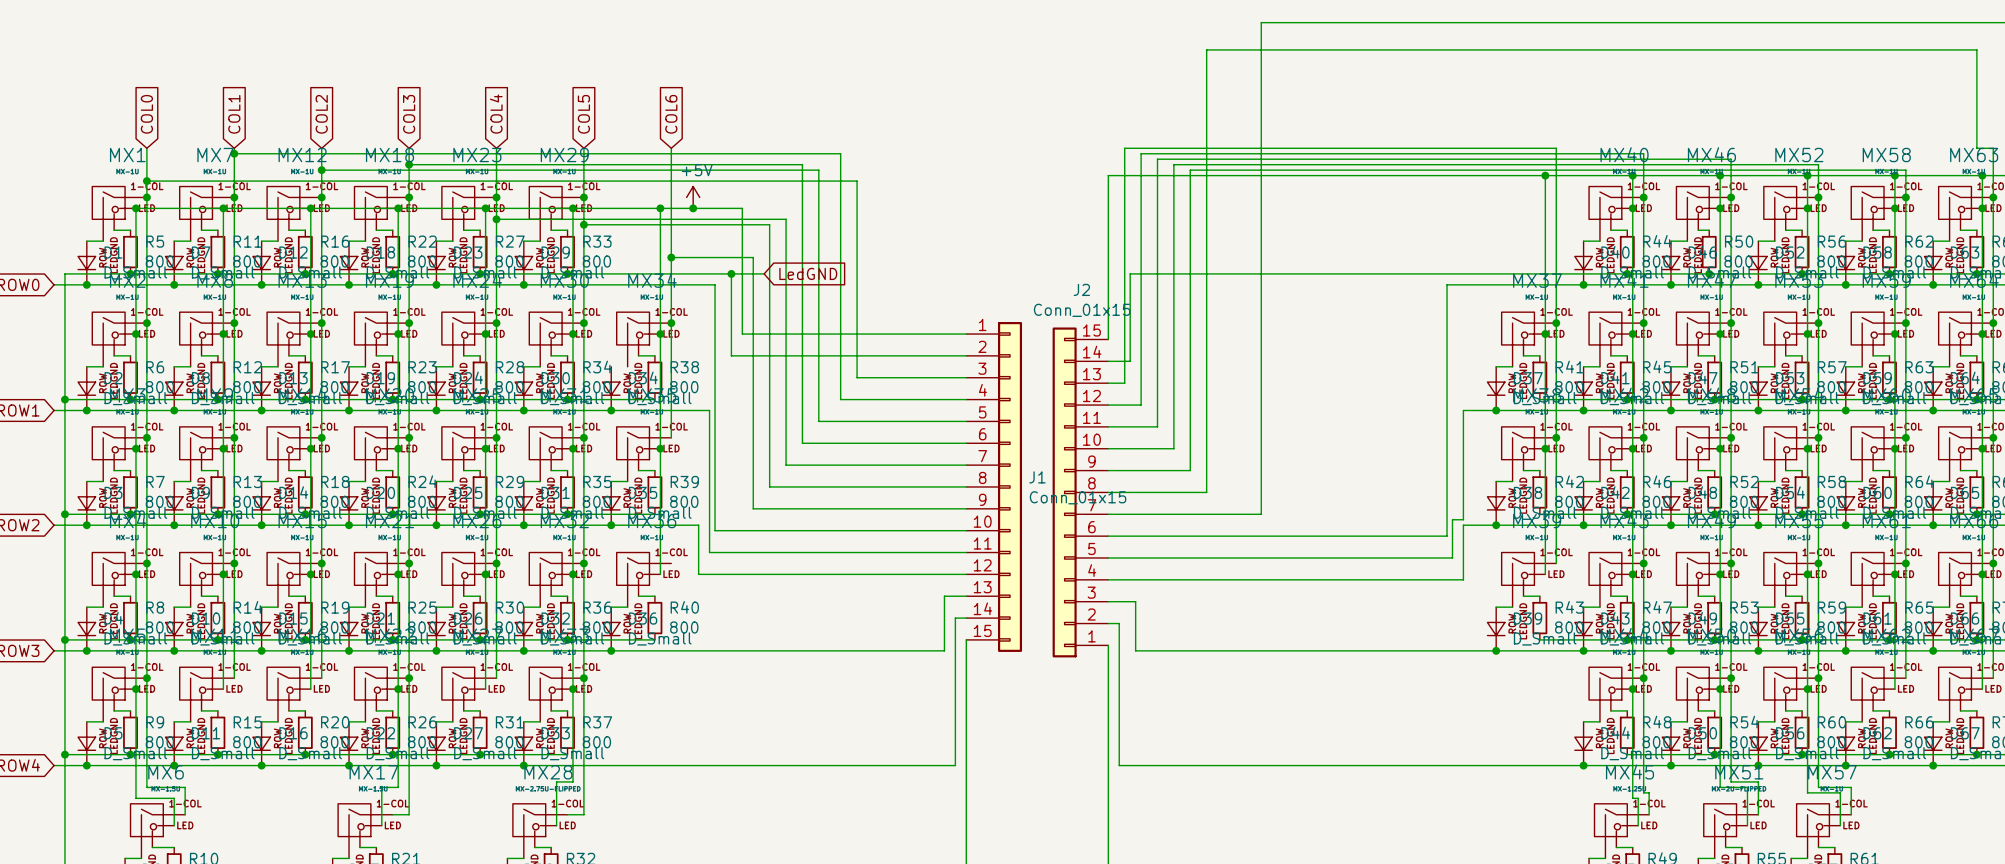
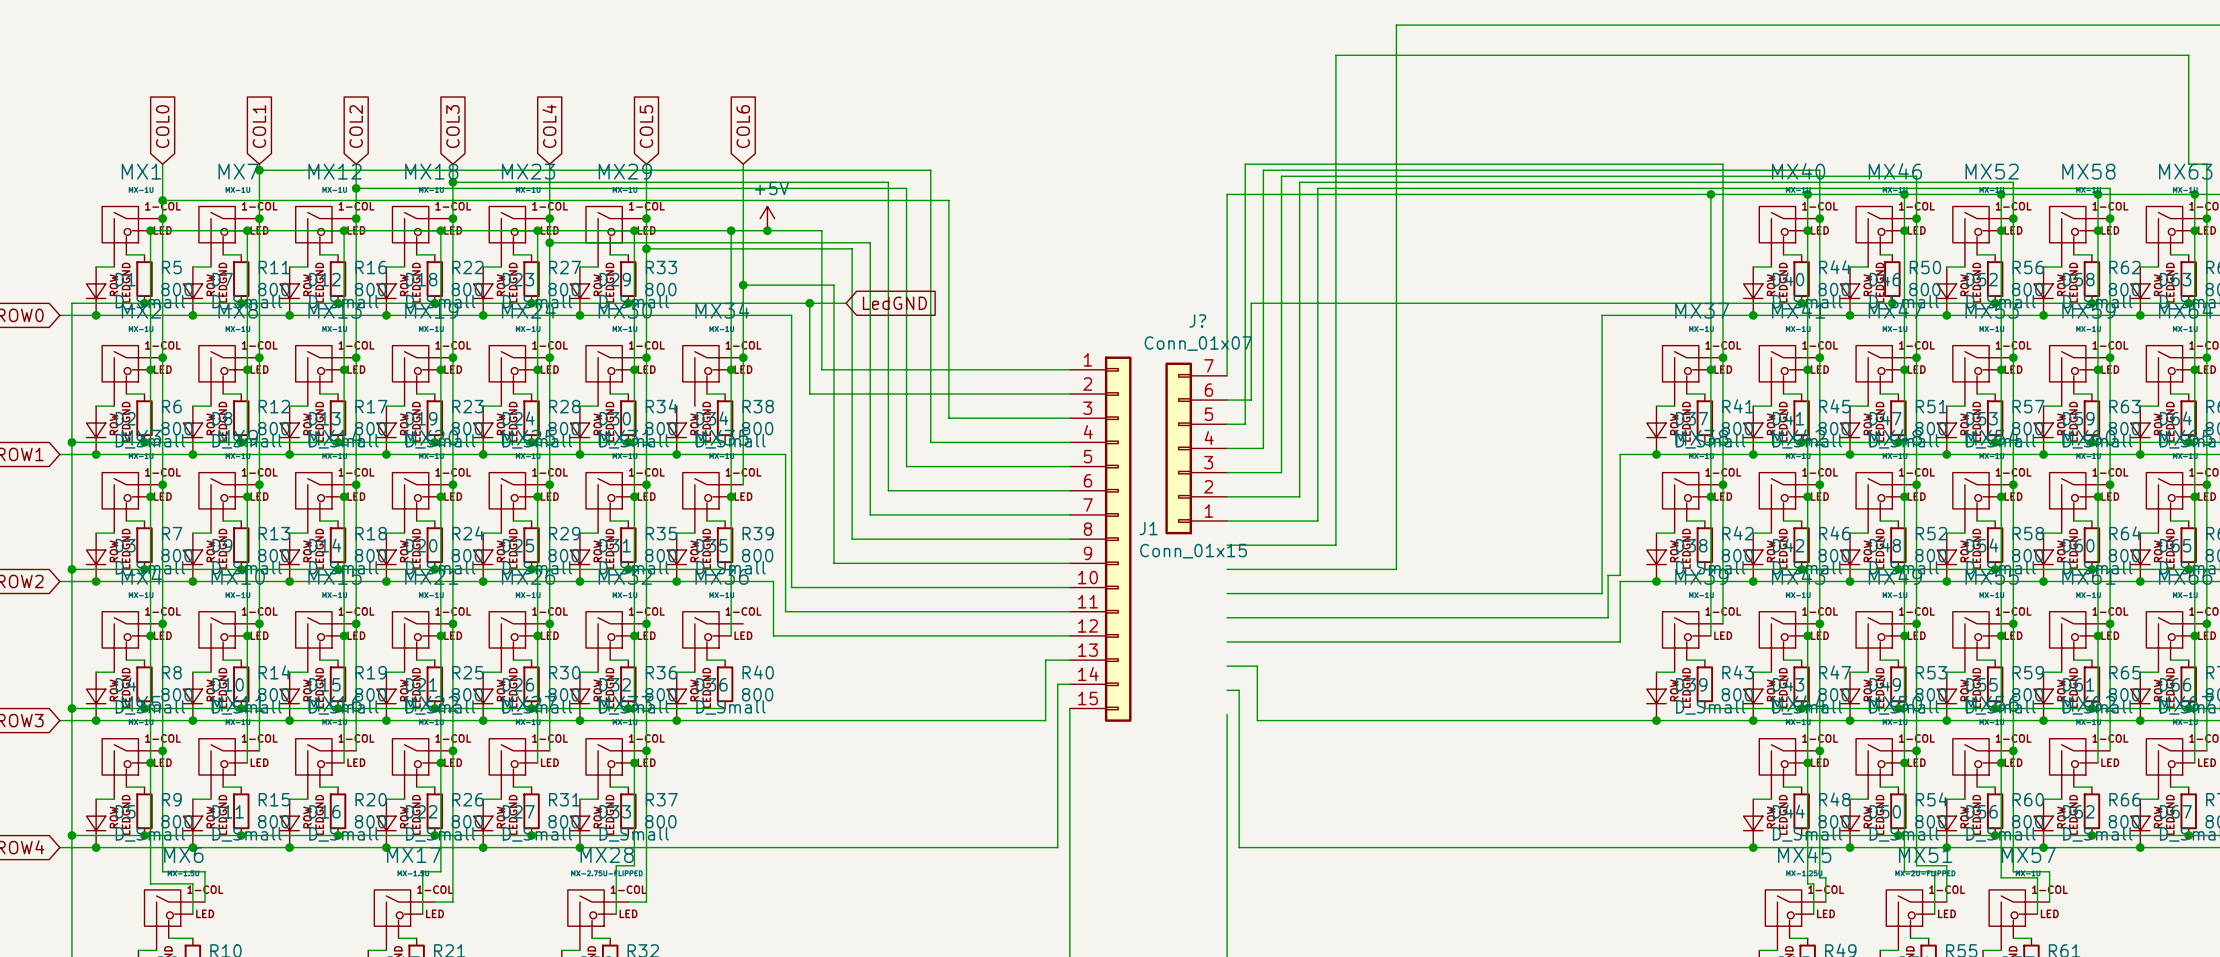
J?: none -> Conn_01x07 (1196, 448)
J2: Conn_01x15 (1080, 492) -> none

